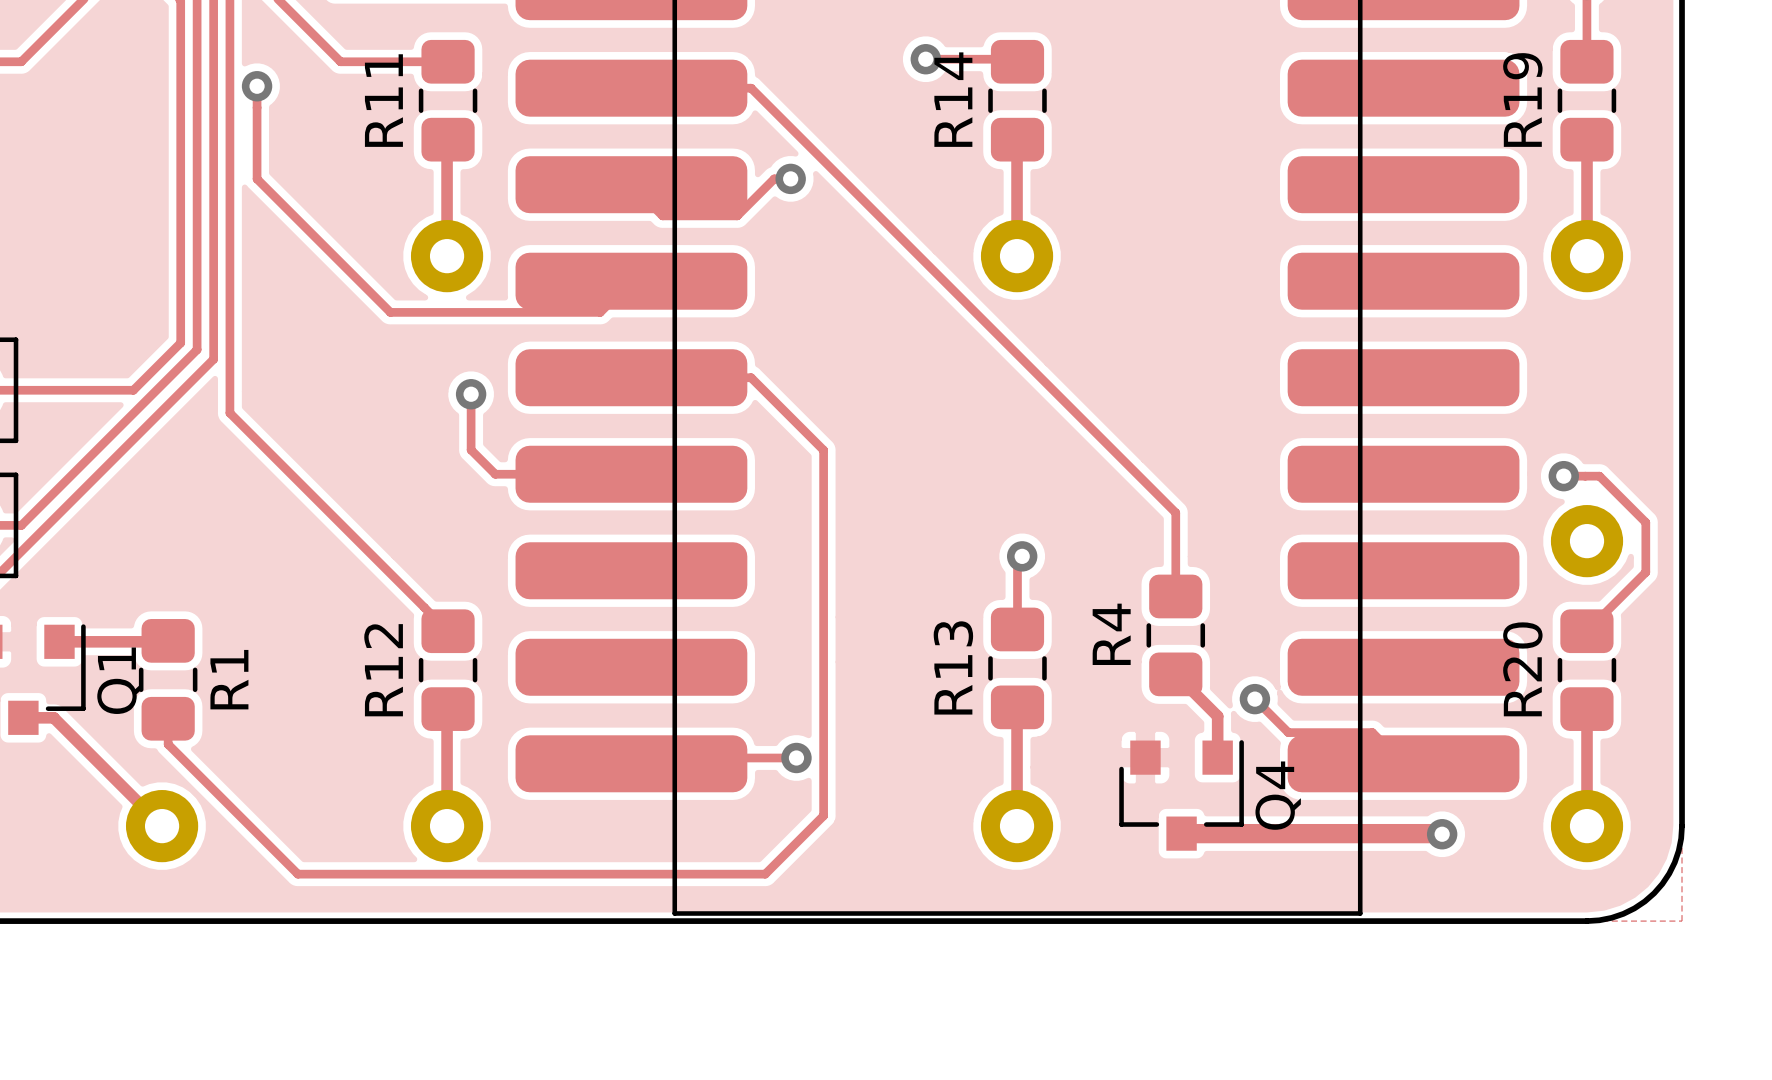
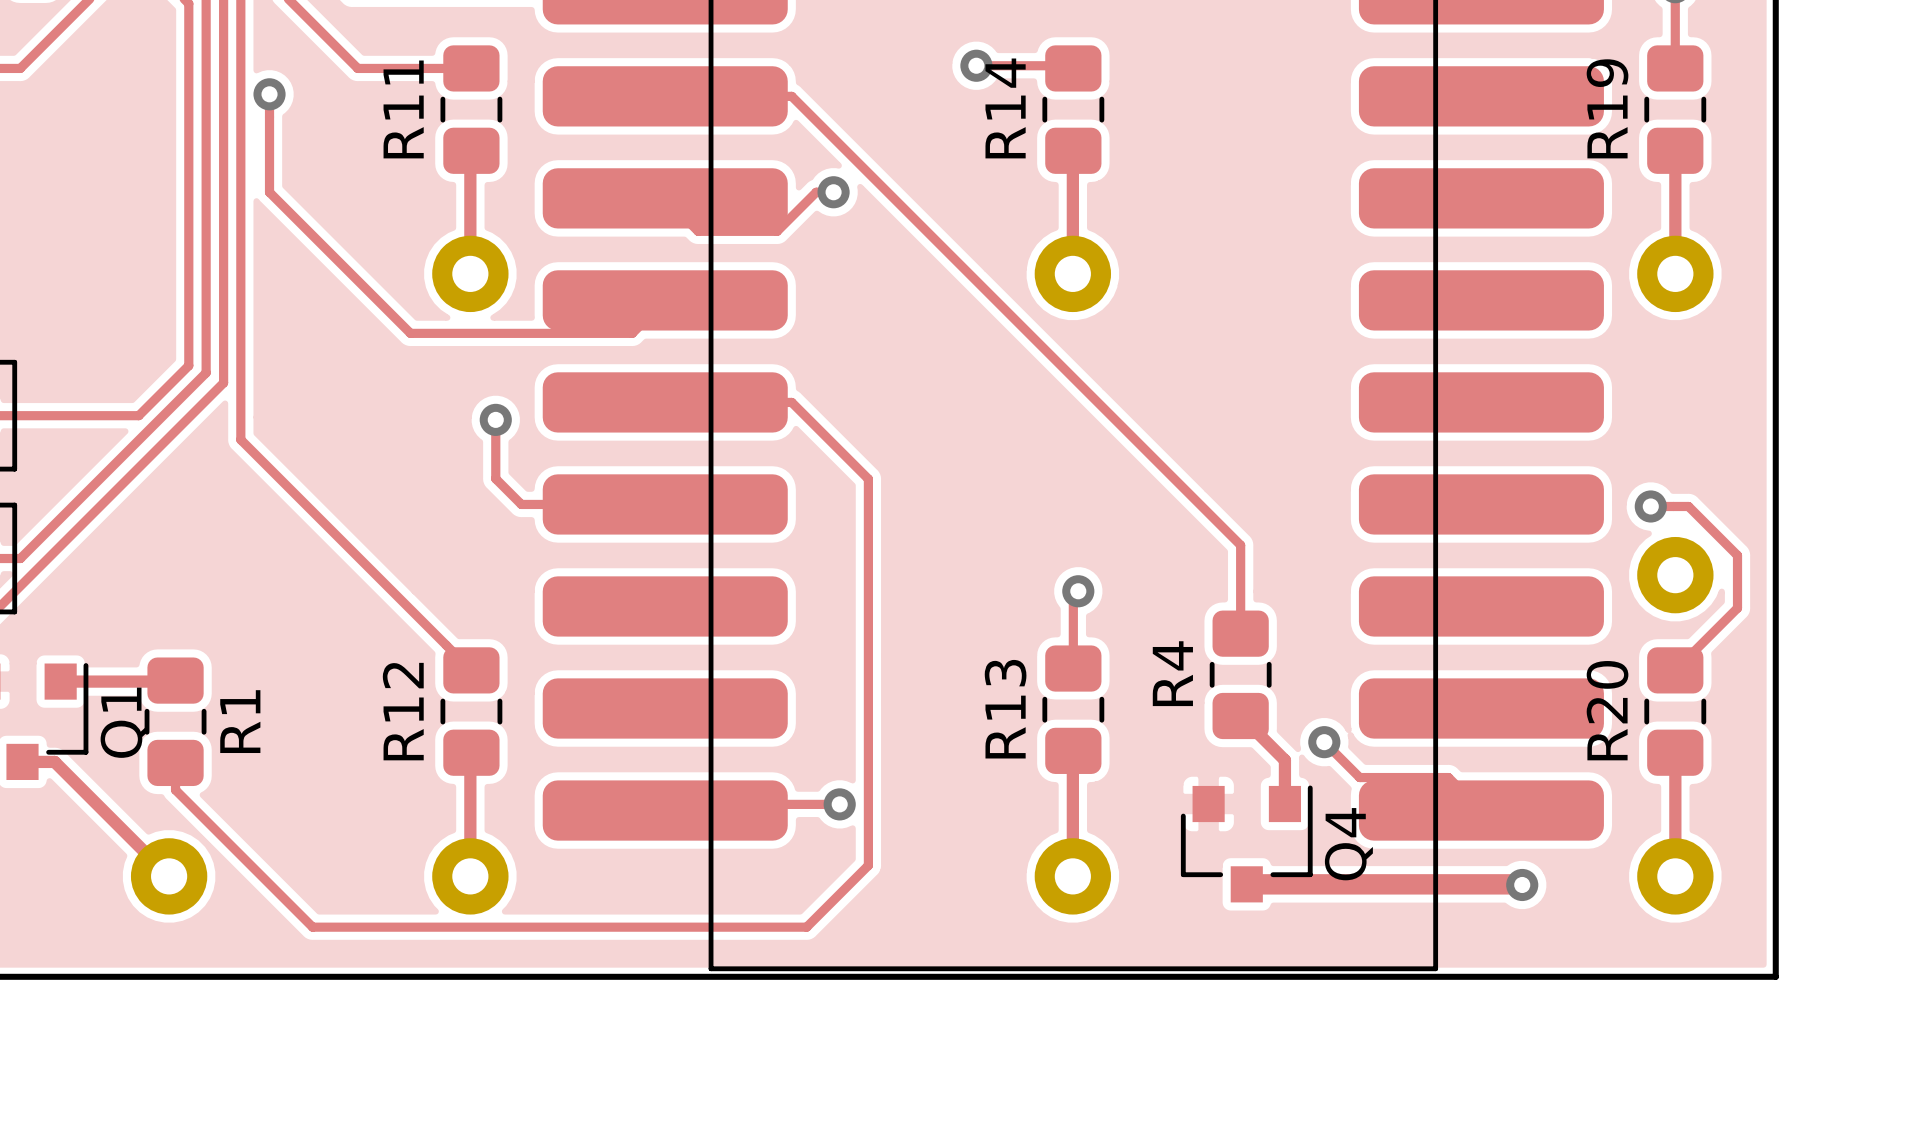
board edge: (1682, 826) (1681, 838) (1674, 862) (1662, 883) (1654, 893) (1644, 901) (1623, 913) (1599, 920) (1587, 921) -> (1775, 876) (1775, 976) (1675, 976)

